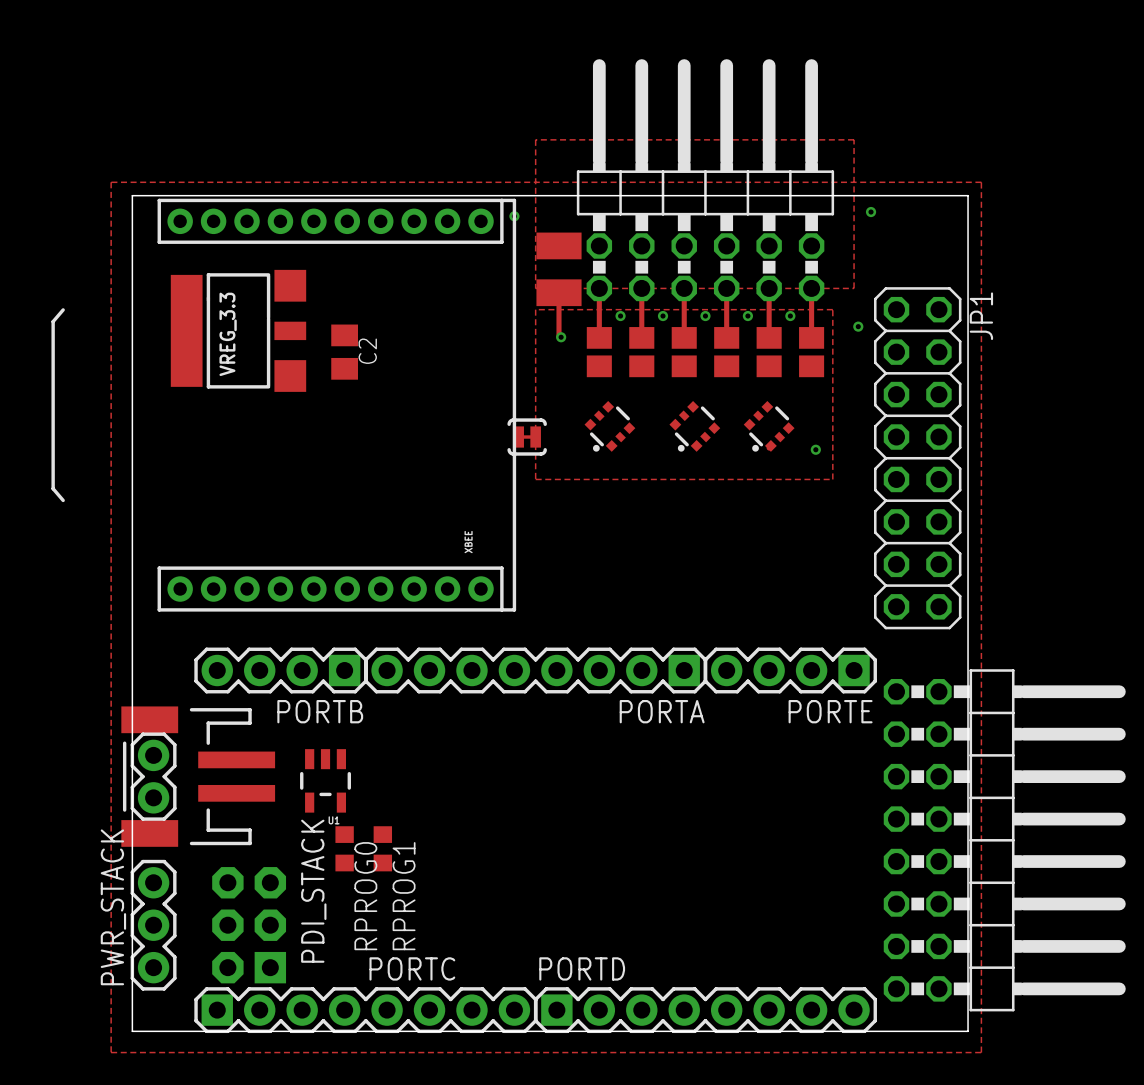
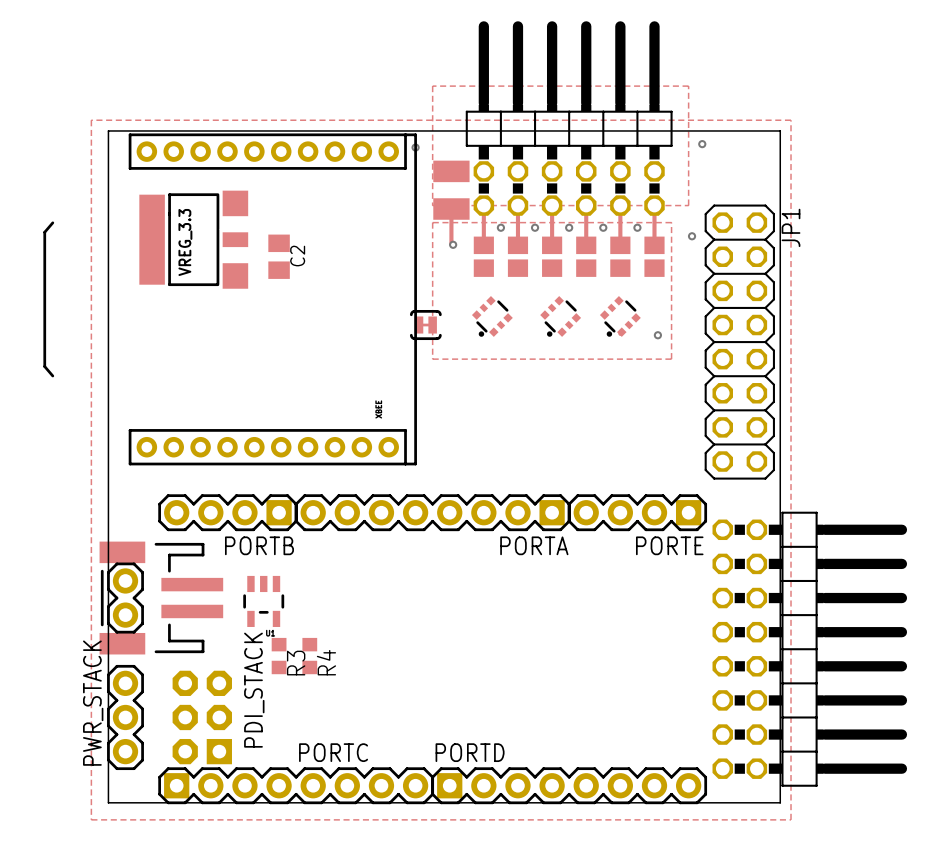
RPROG0 name: RPROG0 (365, 896) -> R3 (296, 663)
RPROG1 name: RPROG1 (404, 896) -> R4 (326, 662)

